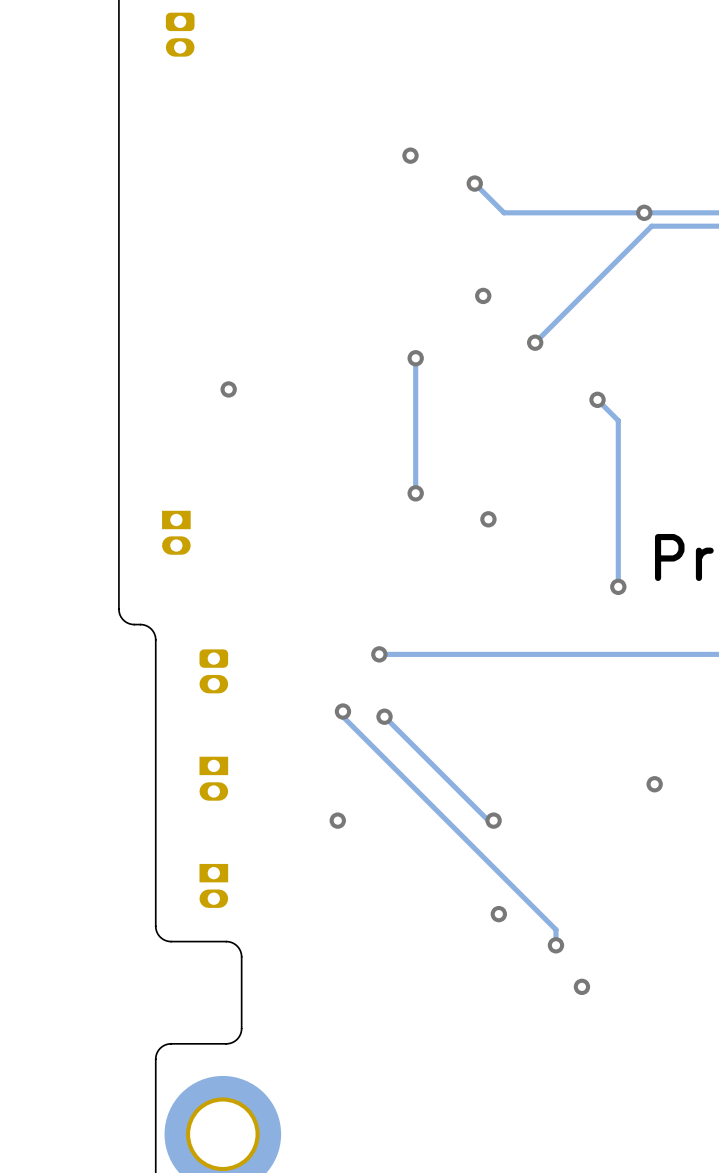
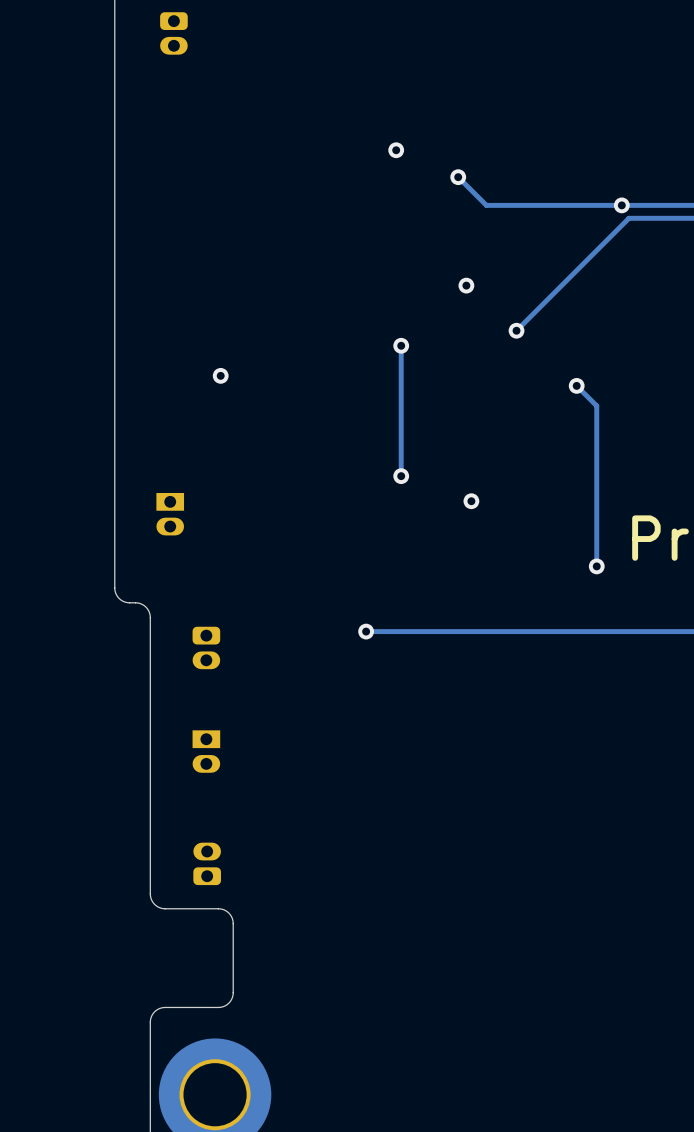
track: (342, 711) (342, 716) (555, 929) (555, 945) -> none
via: (342, 711) -> none
track: (384, 716) (488, 820) (493, 820) -> none
via: (384, 716) -> none
via: (654, 784) -> none
via: (337, 820) -> none
via: (493, 820) -> none
part footprint: [199, 863, 229, 908] -> [193, 842, 221, 886]
via: (498, 914) -> none
via: (555, 945) -> none
via: (581, 986) -> none

